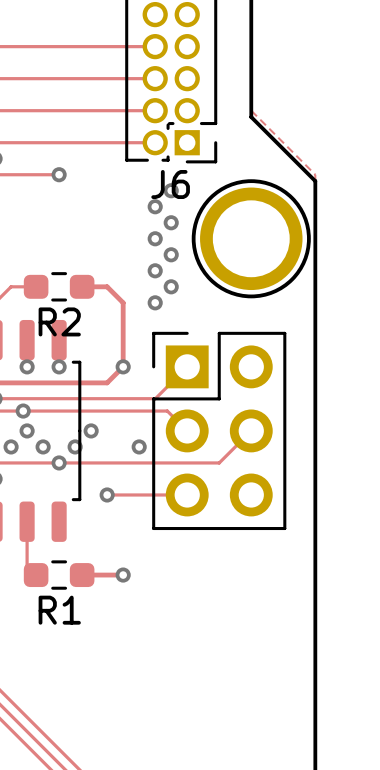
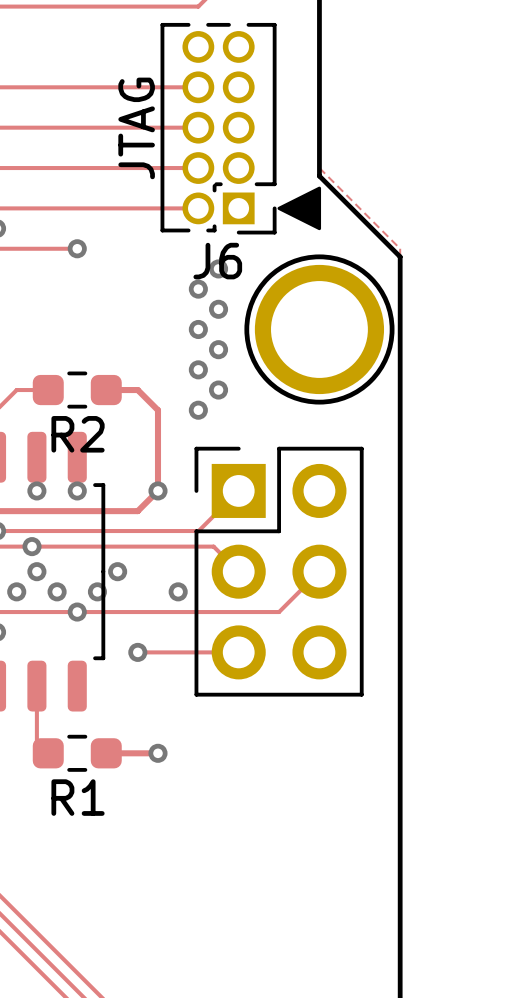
text: none -> JTAG (136, 128)
drawing: none -> [277, 186, 322, 231]

